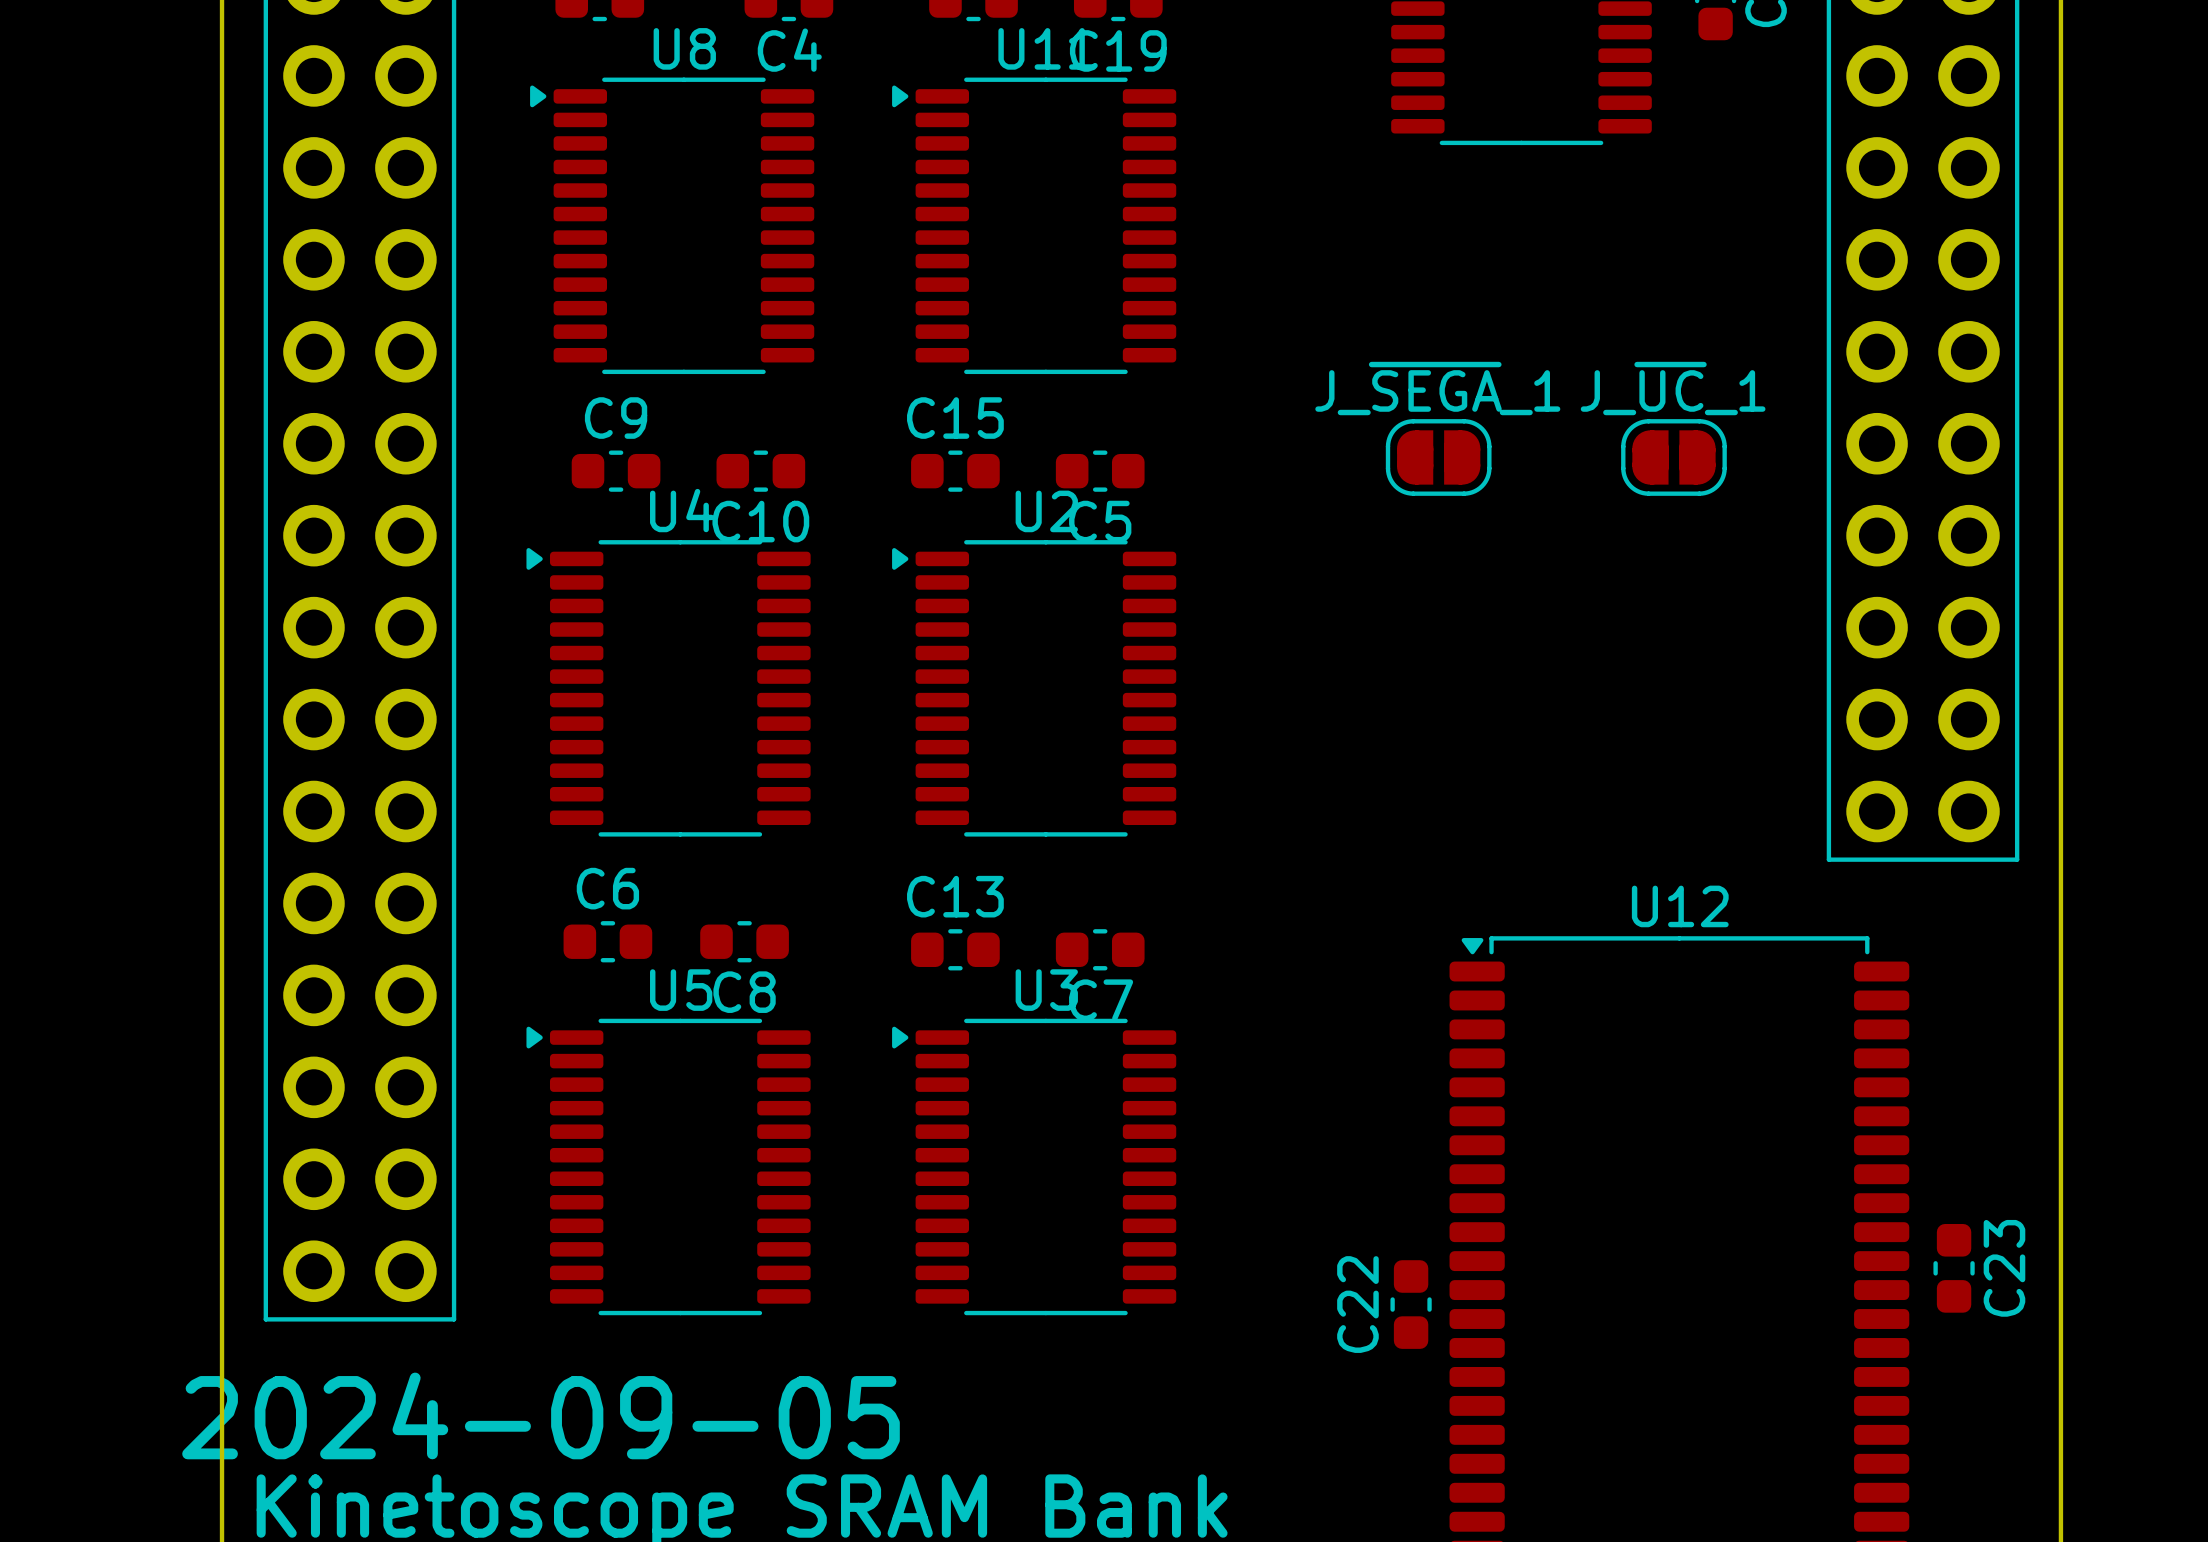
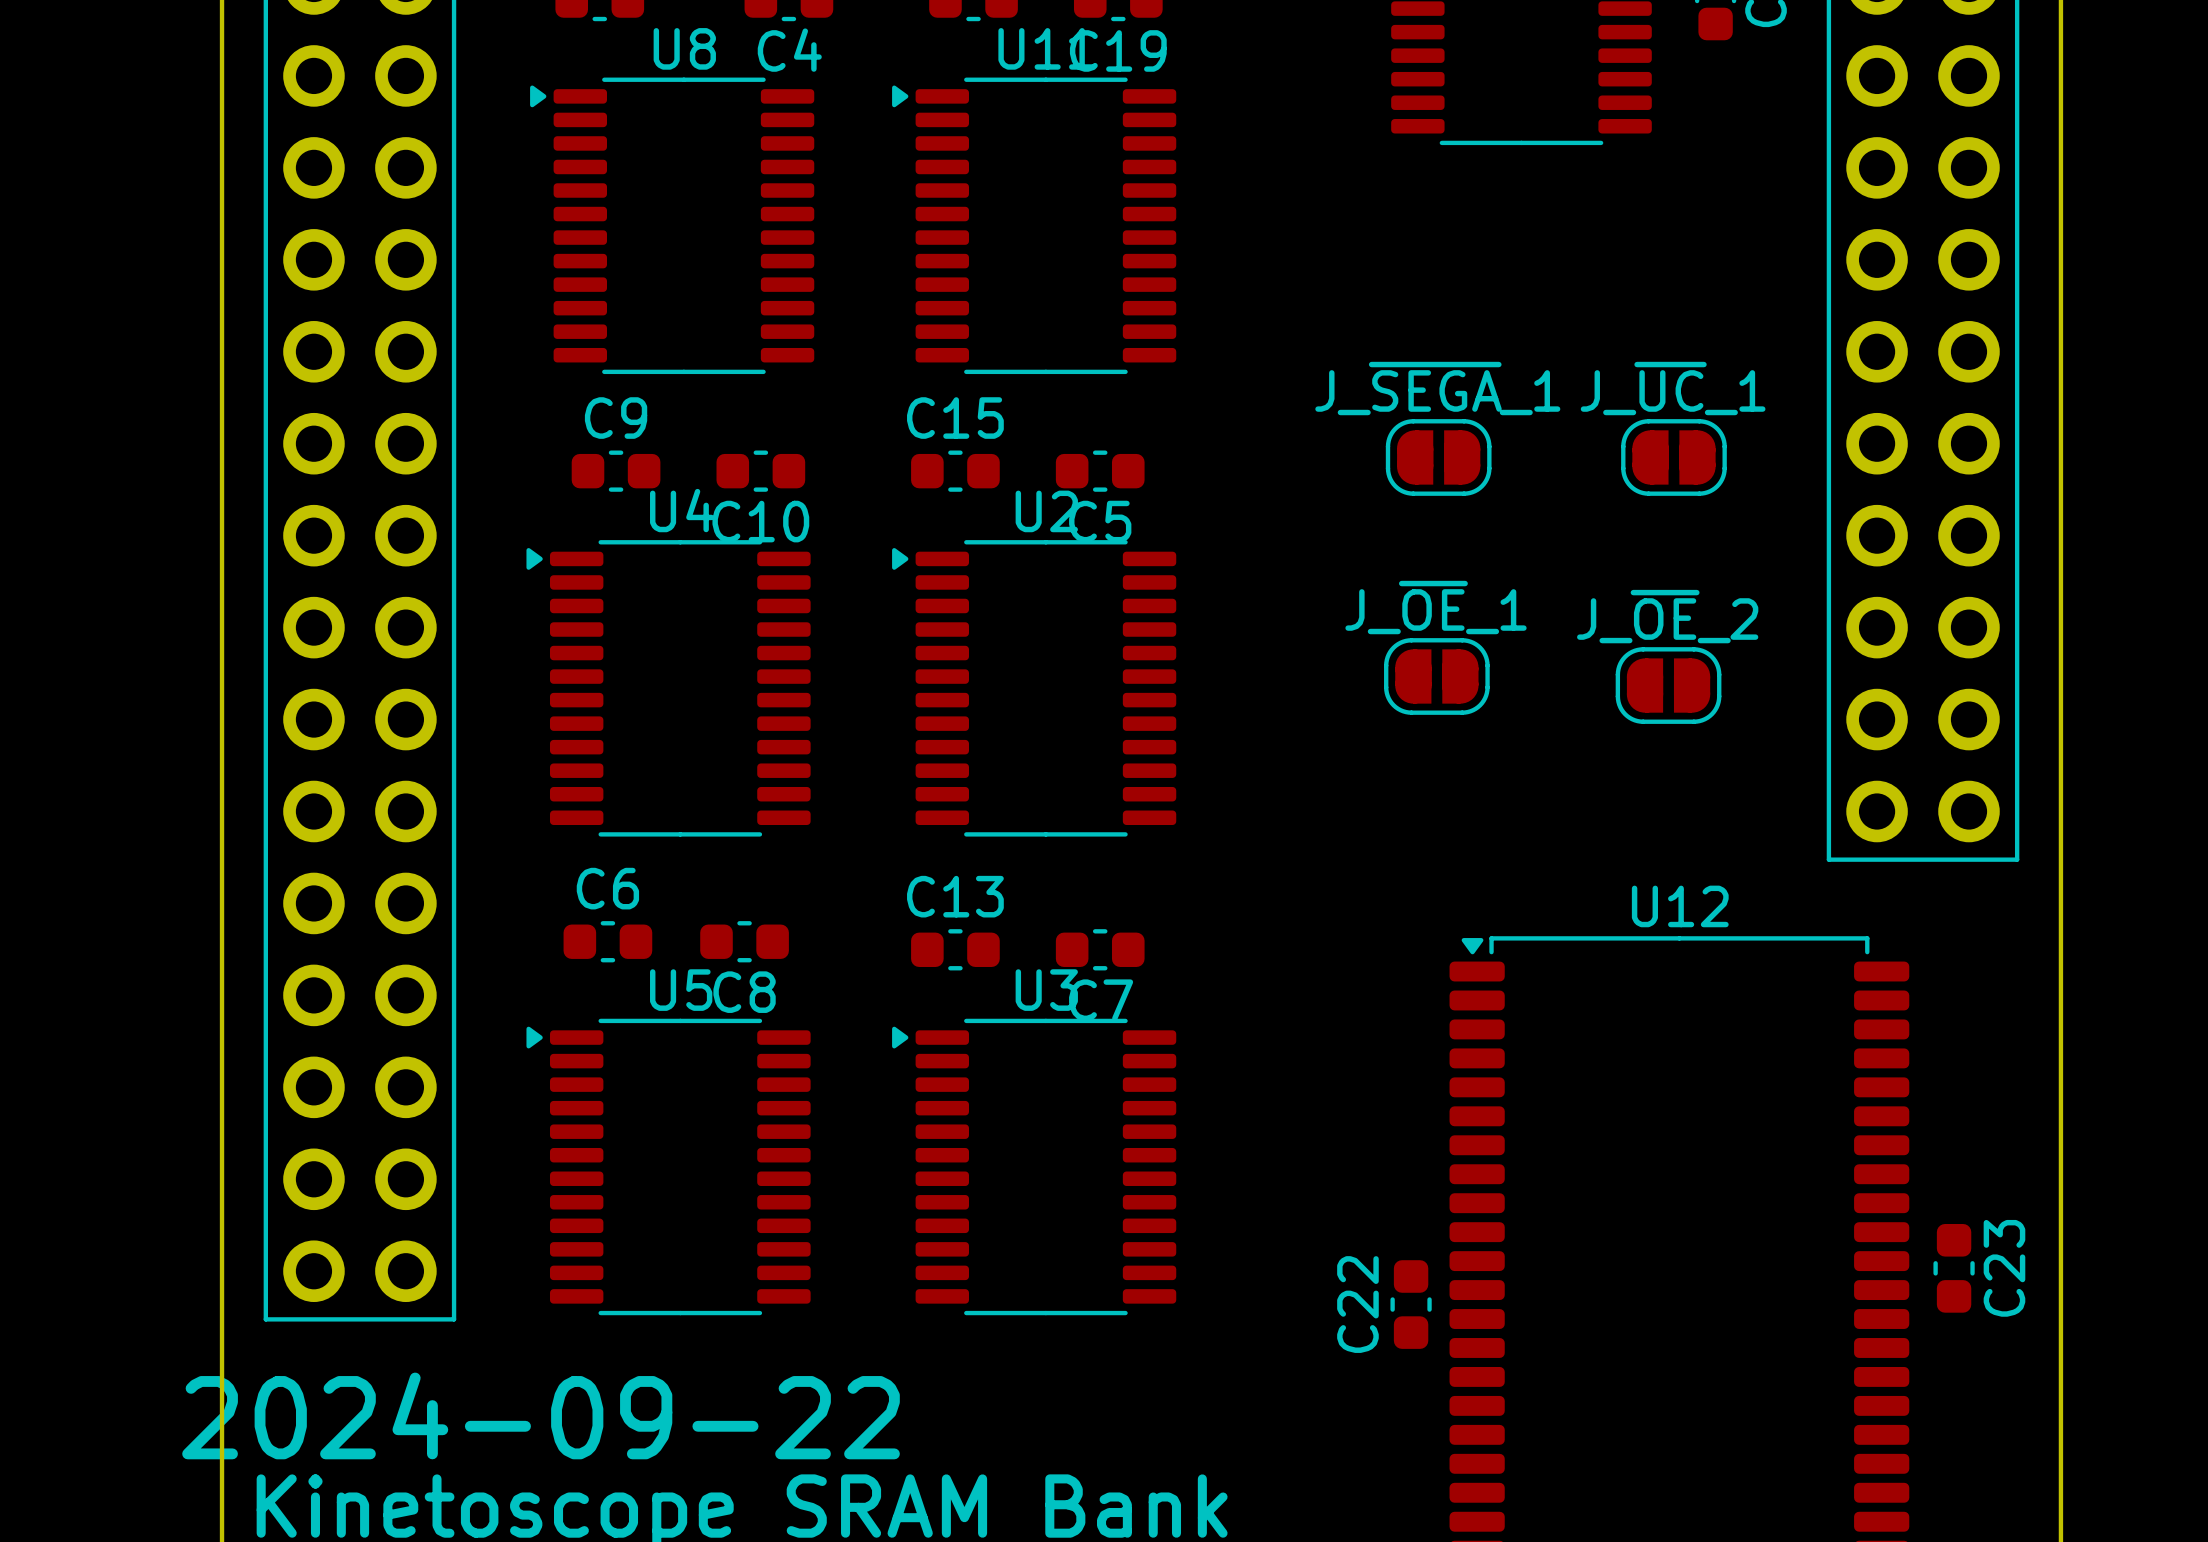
J_~{OE}_1: none -> (1436, 676)
J_~{OE}_2: none -> (1668, 685)
text: 2024-09-05 (541, 1415) -> 2024-09-22 (541, 1415)

